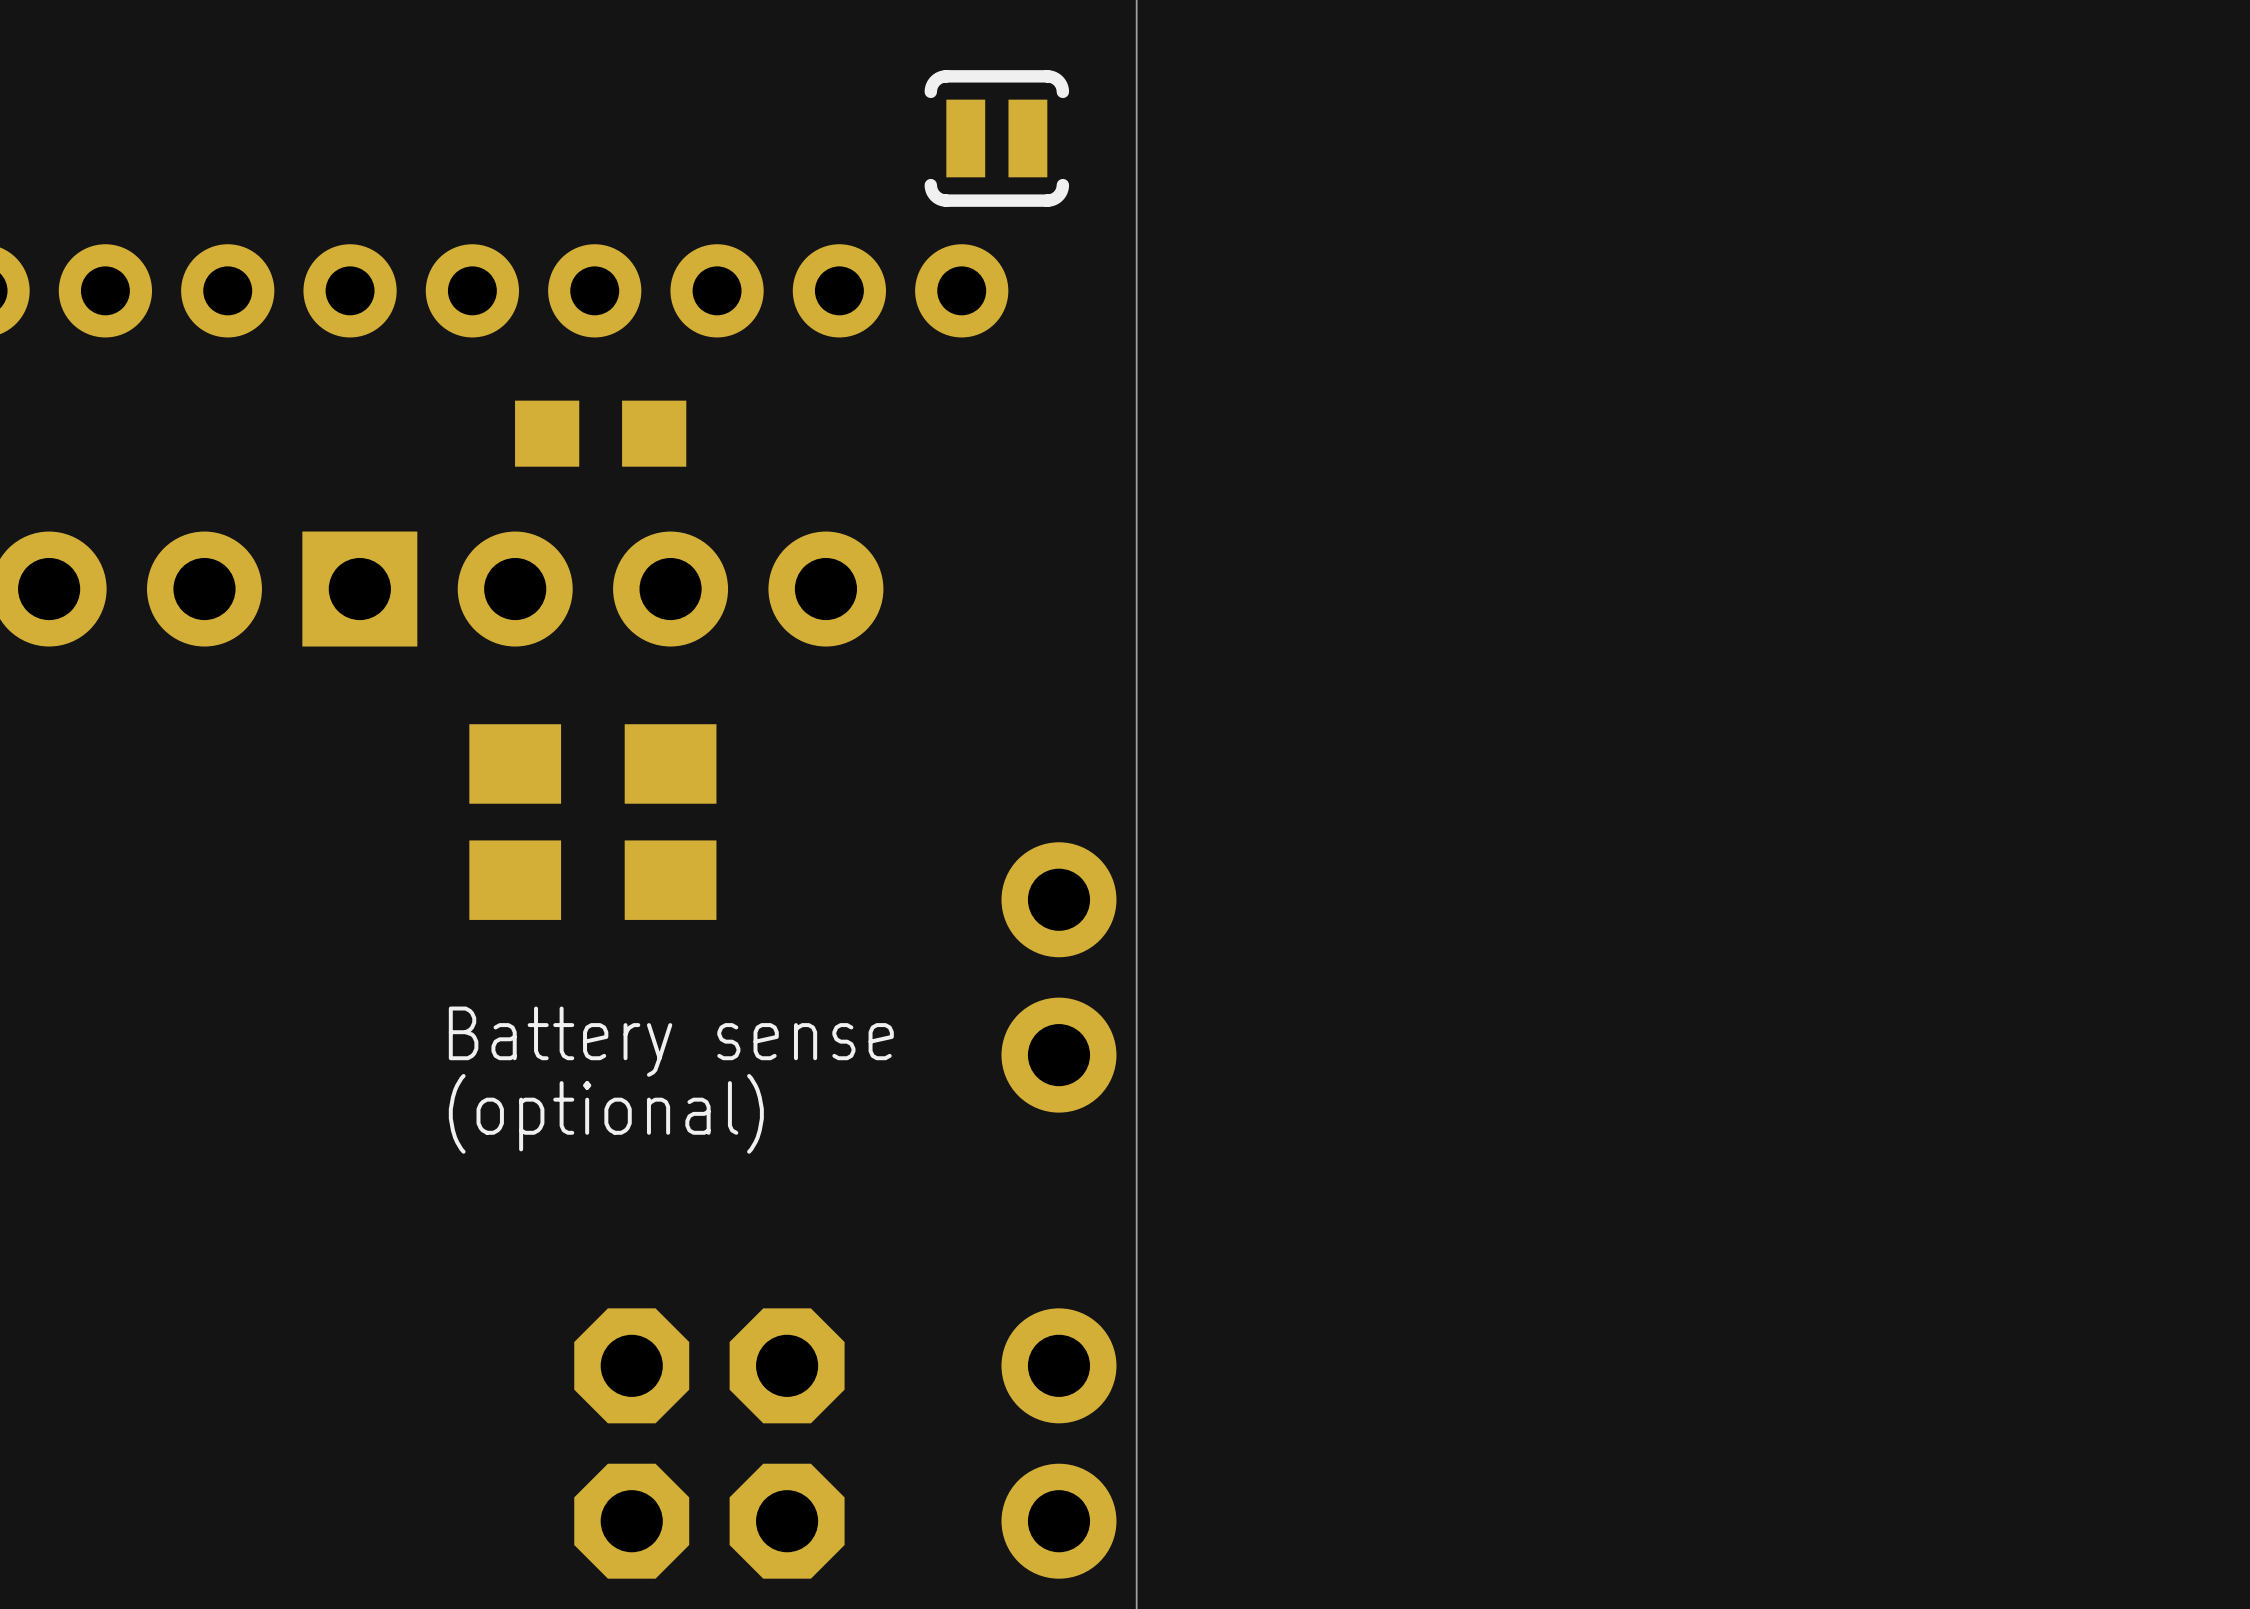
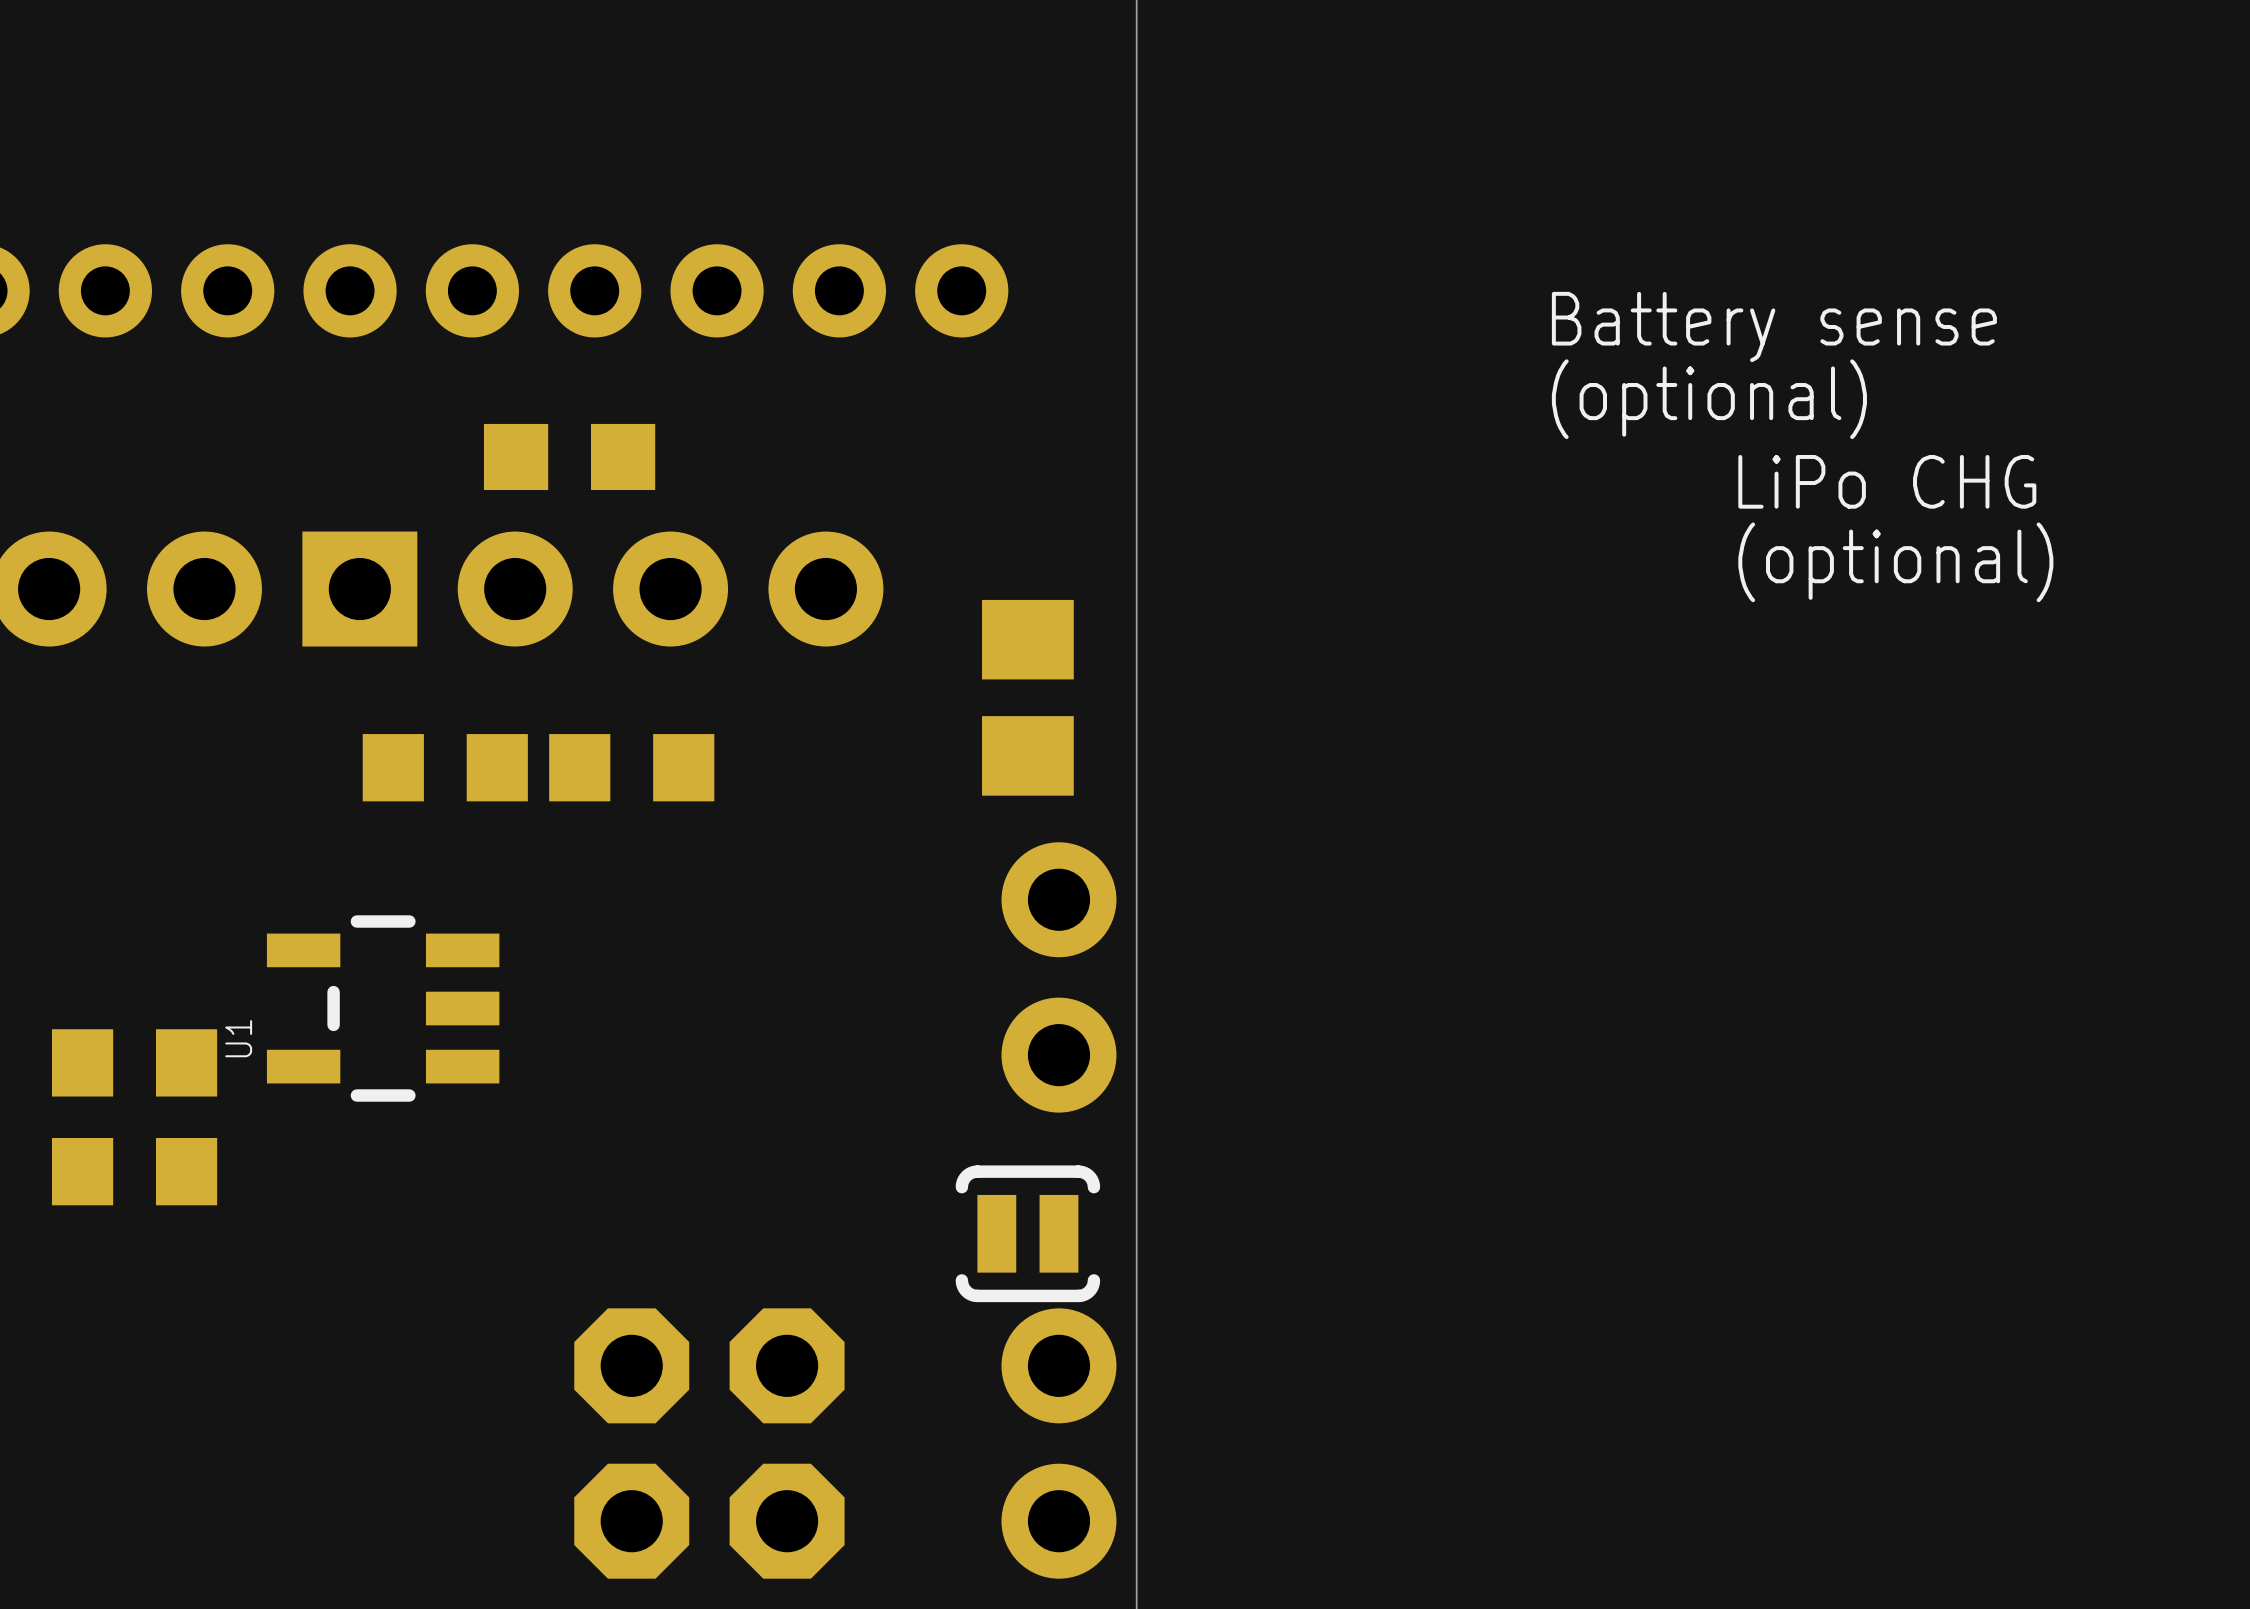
part position: (996, 138) -> (1027, 1233)
text: none -> (optional) (1709, 399)
part position: (600, 433) -> (569, 456)
text: none -> LiPo CHG (1887, 481)
text: none -> (optional) (1895, 562)
part: none -> (1027, 697)
part: none -> (445, 767)
part: none -> (631, 767)
part: (515, 822) -> none
part: (670, 822) -> none
U1: none -> (383, 1008)
text position: Battery sense (671, 1041) -> Battery sense (1774, 326)
part: none -> (134, 1062)
text: (optional) (606, 1113) -> none
part: none -> (134, 1171)

